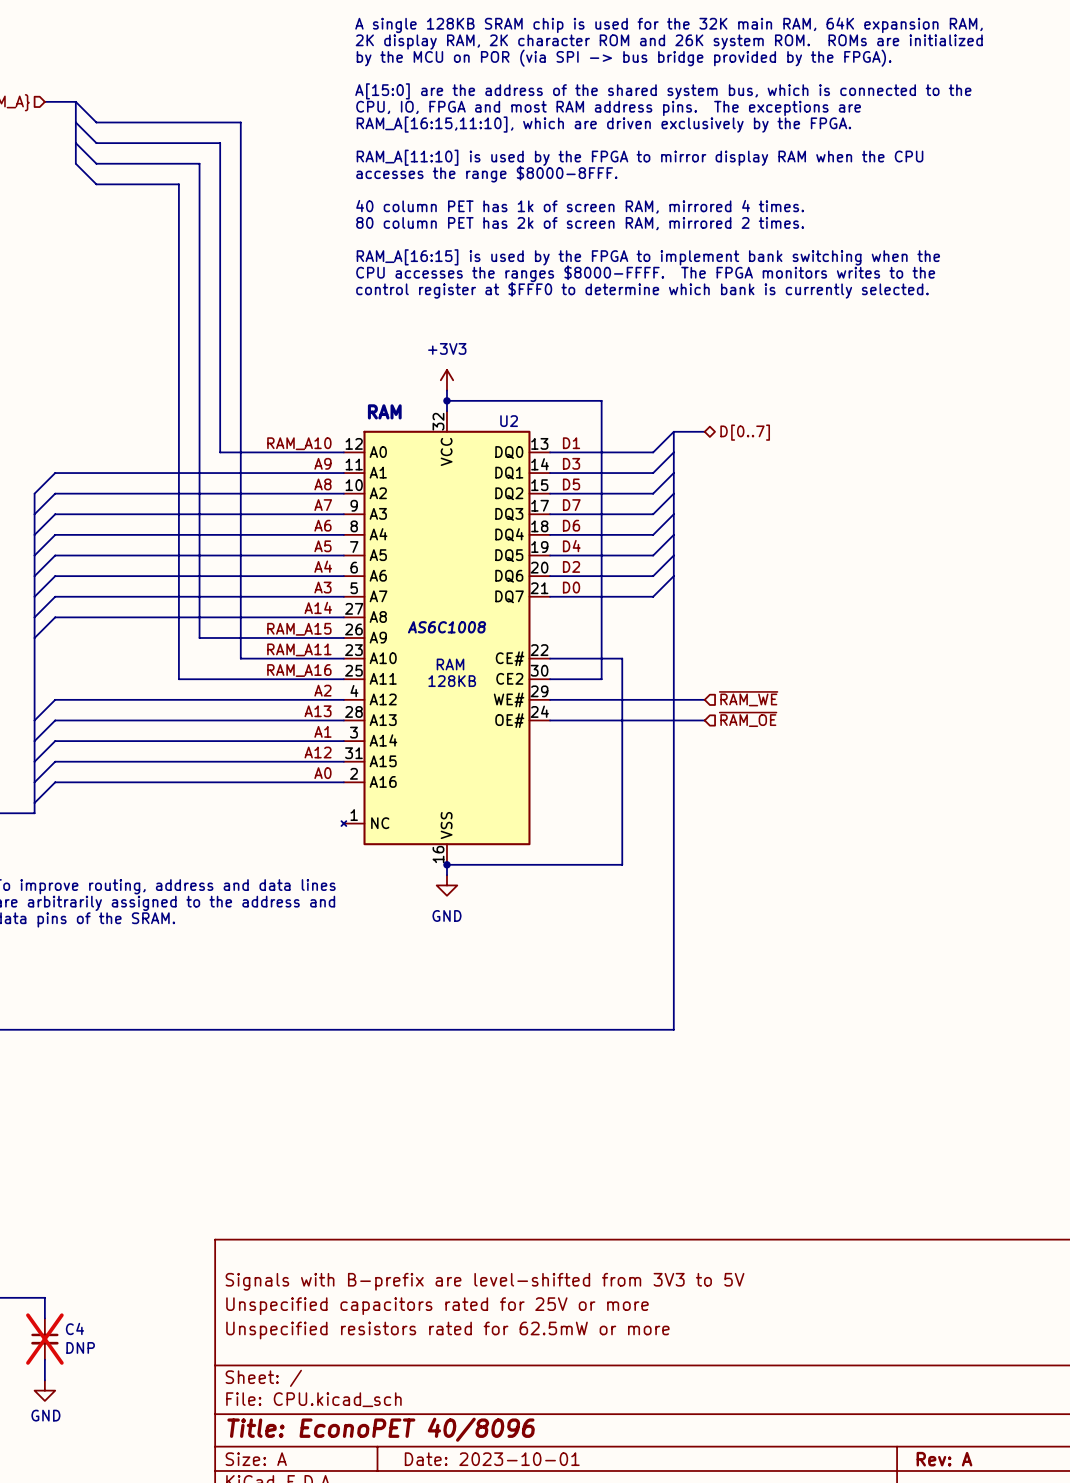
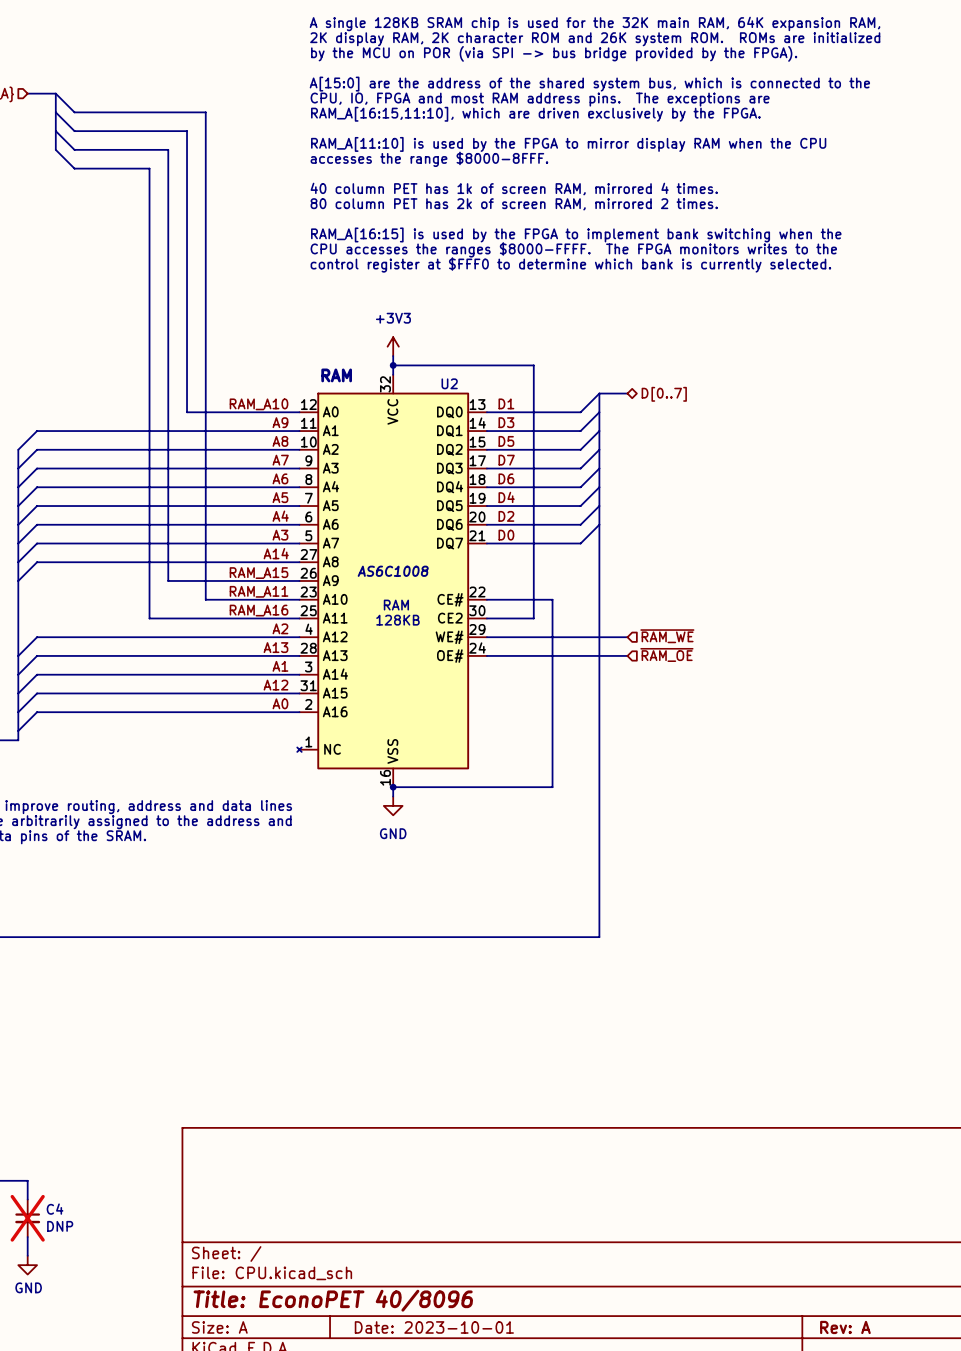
title block: Signals with B-prefix are level-shifted from 3V3 to 5V (485, 1281) -> none
title block: Unspecified capacitors rated for 25V or more (437, 1306) -> none
title block: Unspecified resistors rated for 62.5mW or more (447, 1330) -> none

